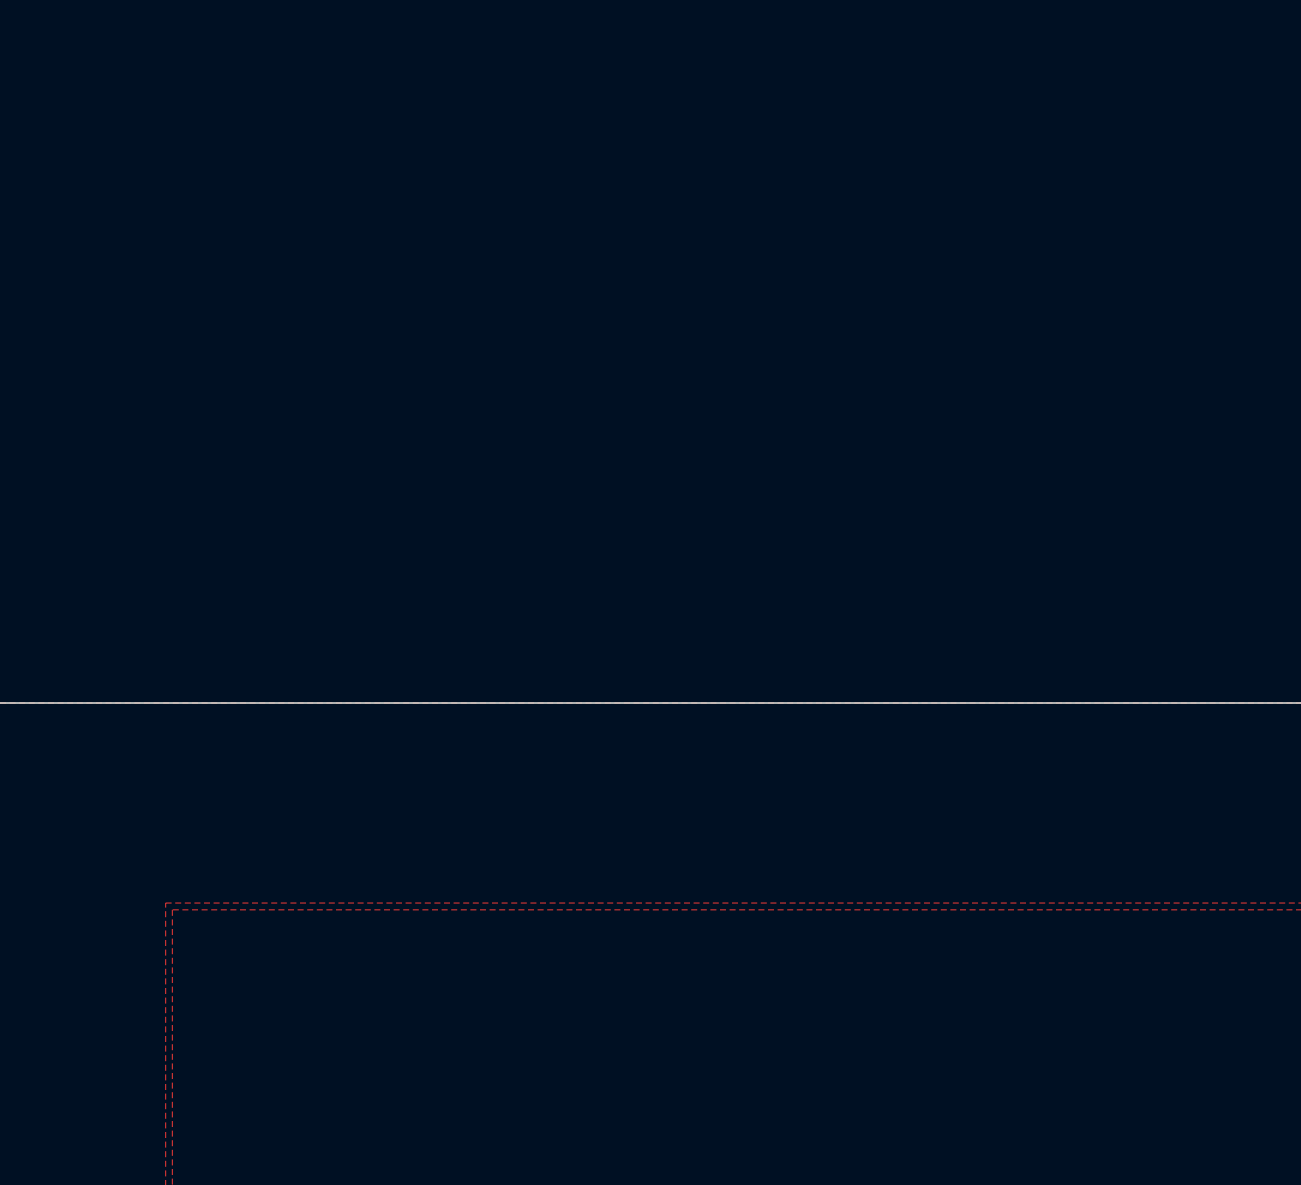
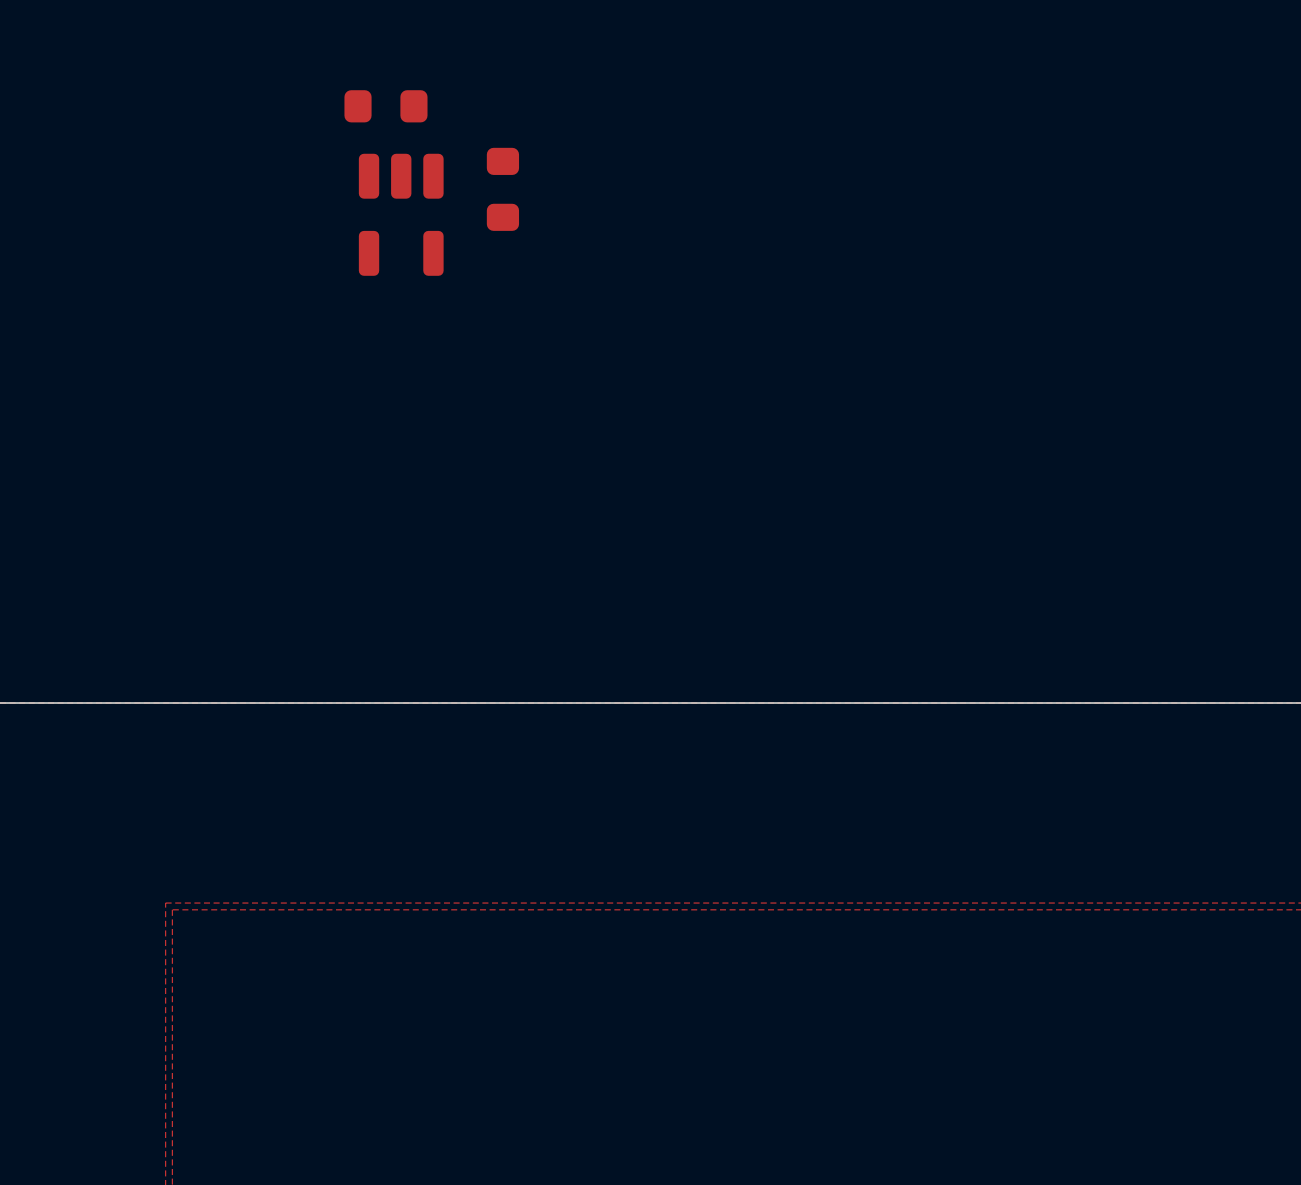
part: none -> (385, 106)
part: none -> (502, 189)
part: none -> (401, 214)

